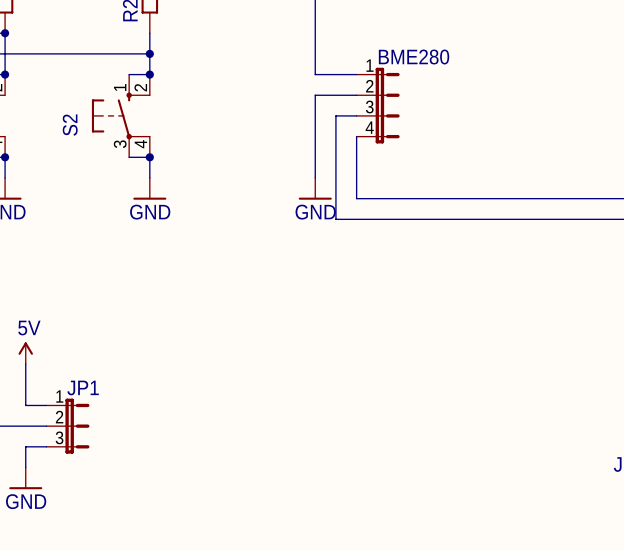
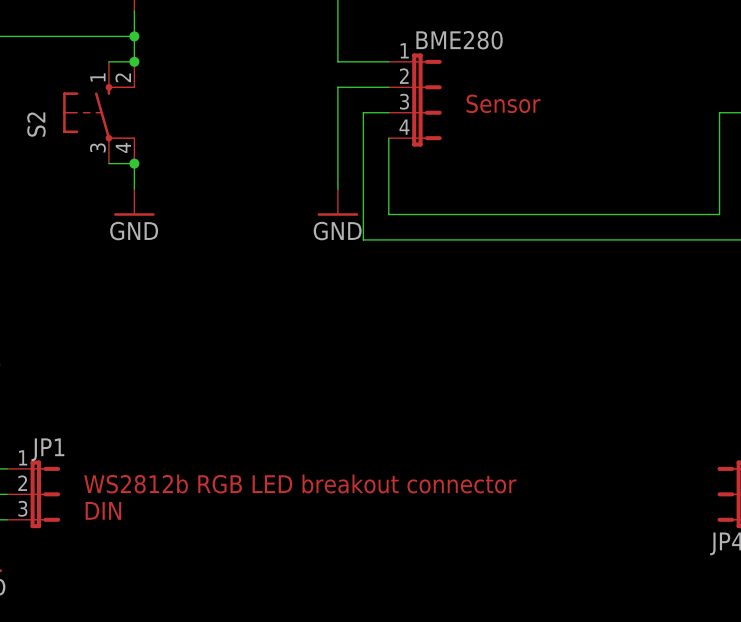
text: none -> Sensor (503, 103)
text: none -> WS2812b RGB LED breakout connector (300, 483)
text: none -> DIN (103, 510)

